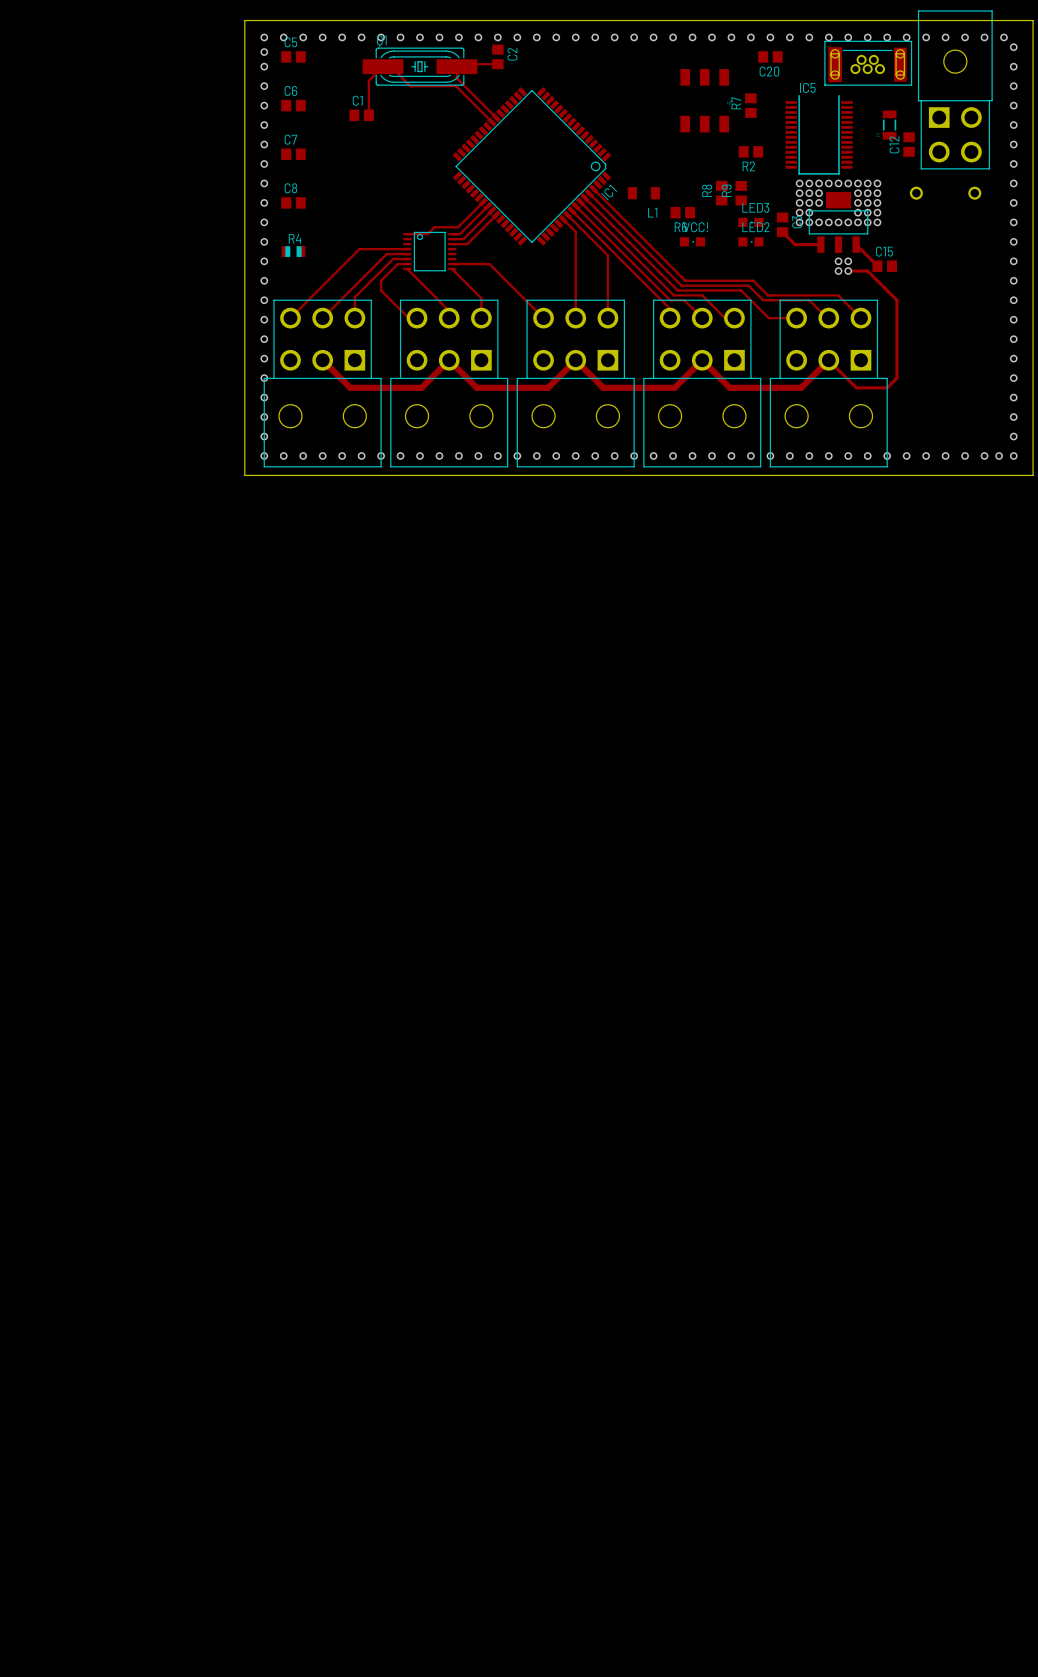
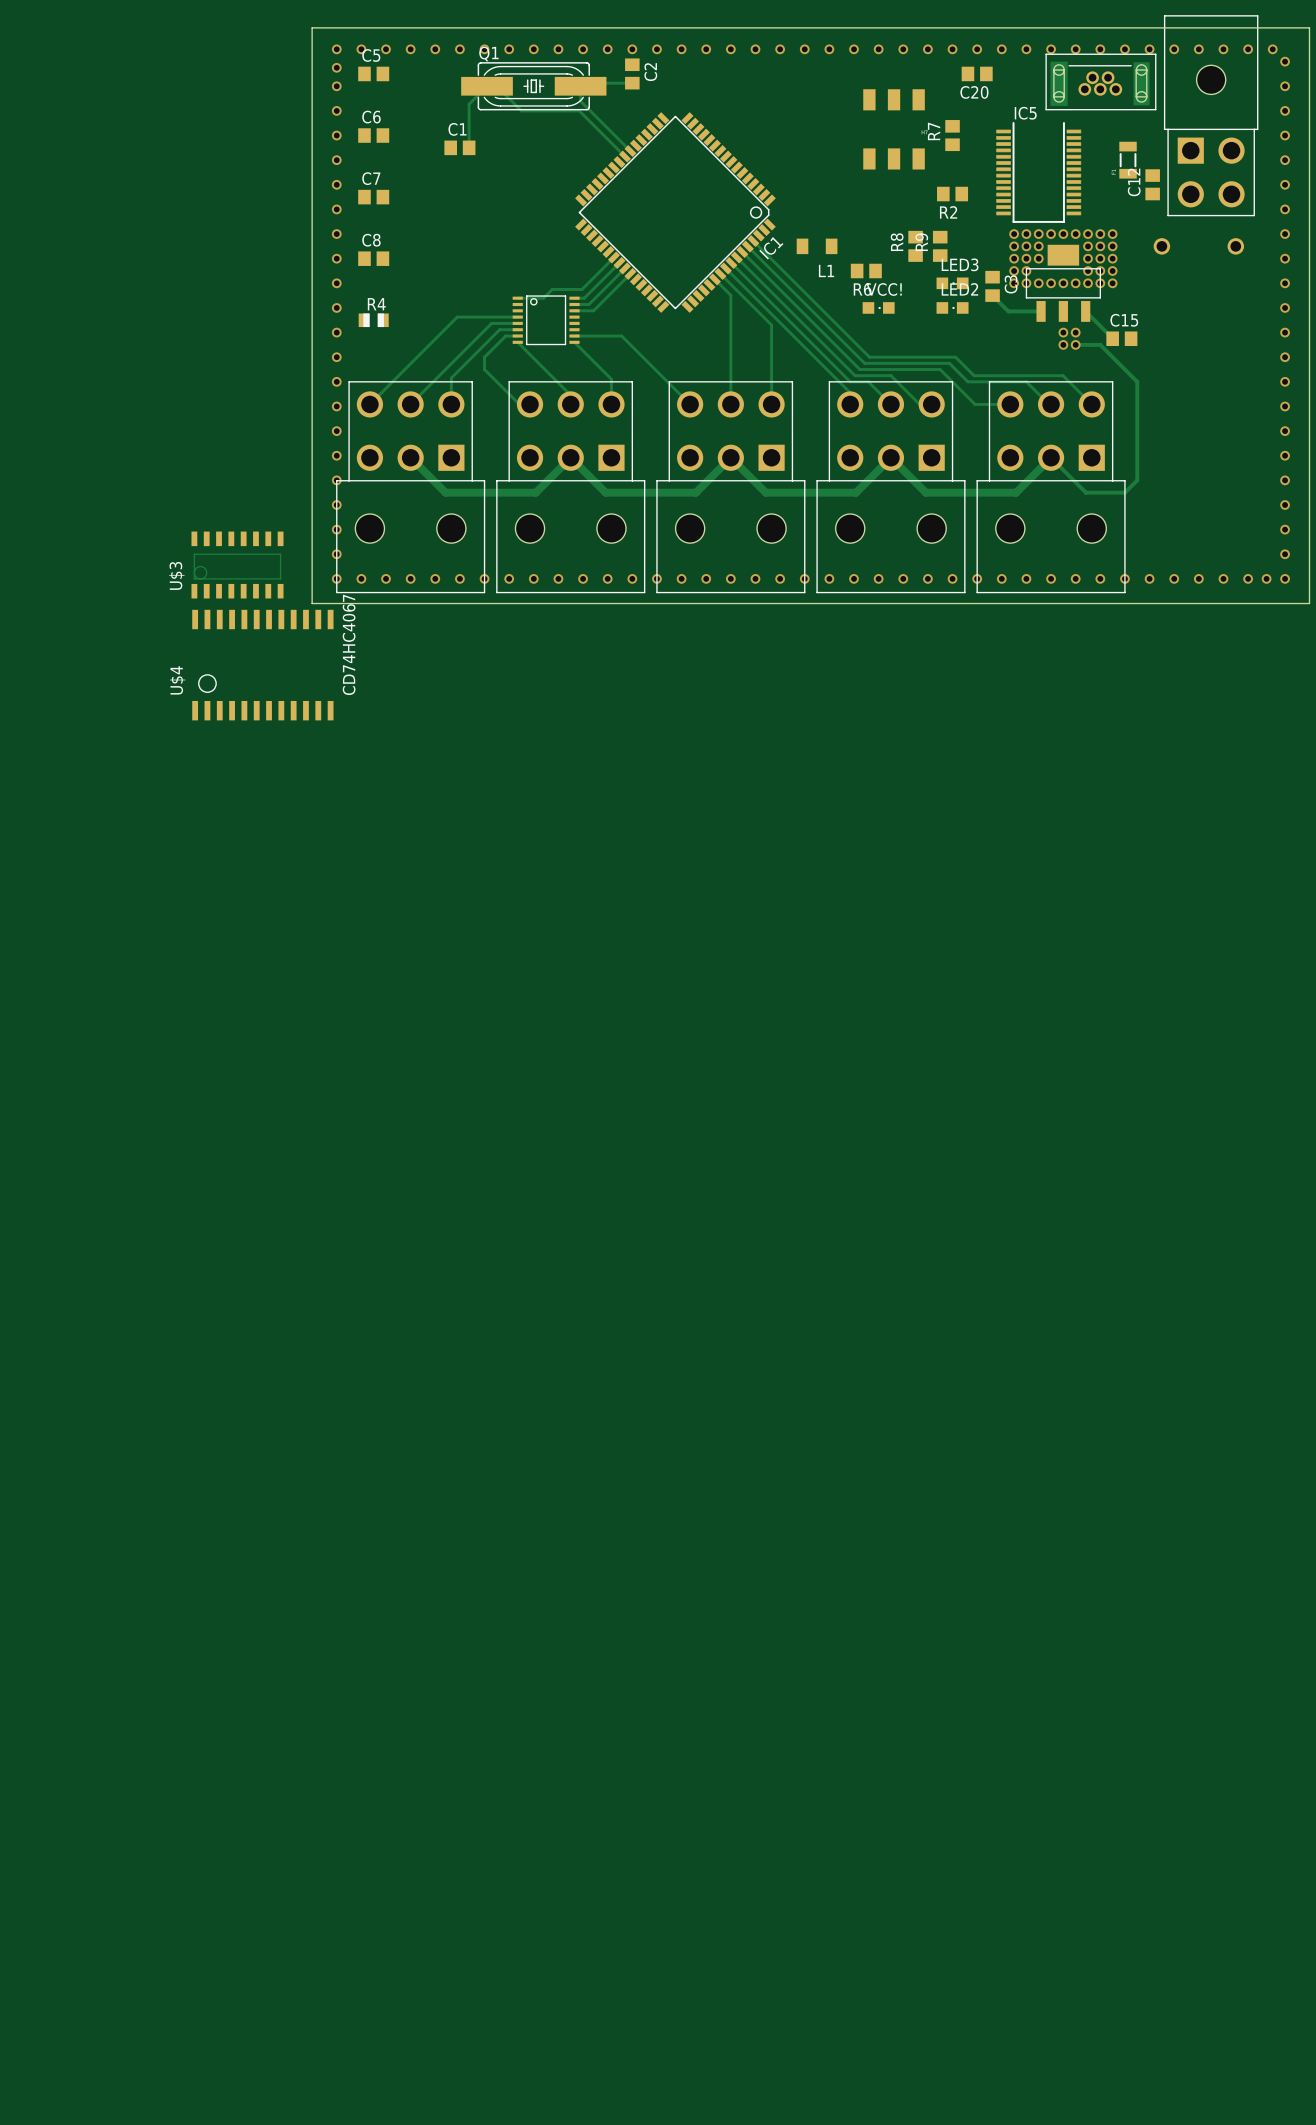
U$3: none -> (237, 565)
U$4: none -> CD74HC4067 (262, 665)

